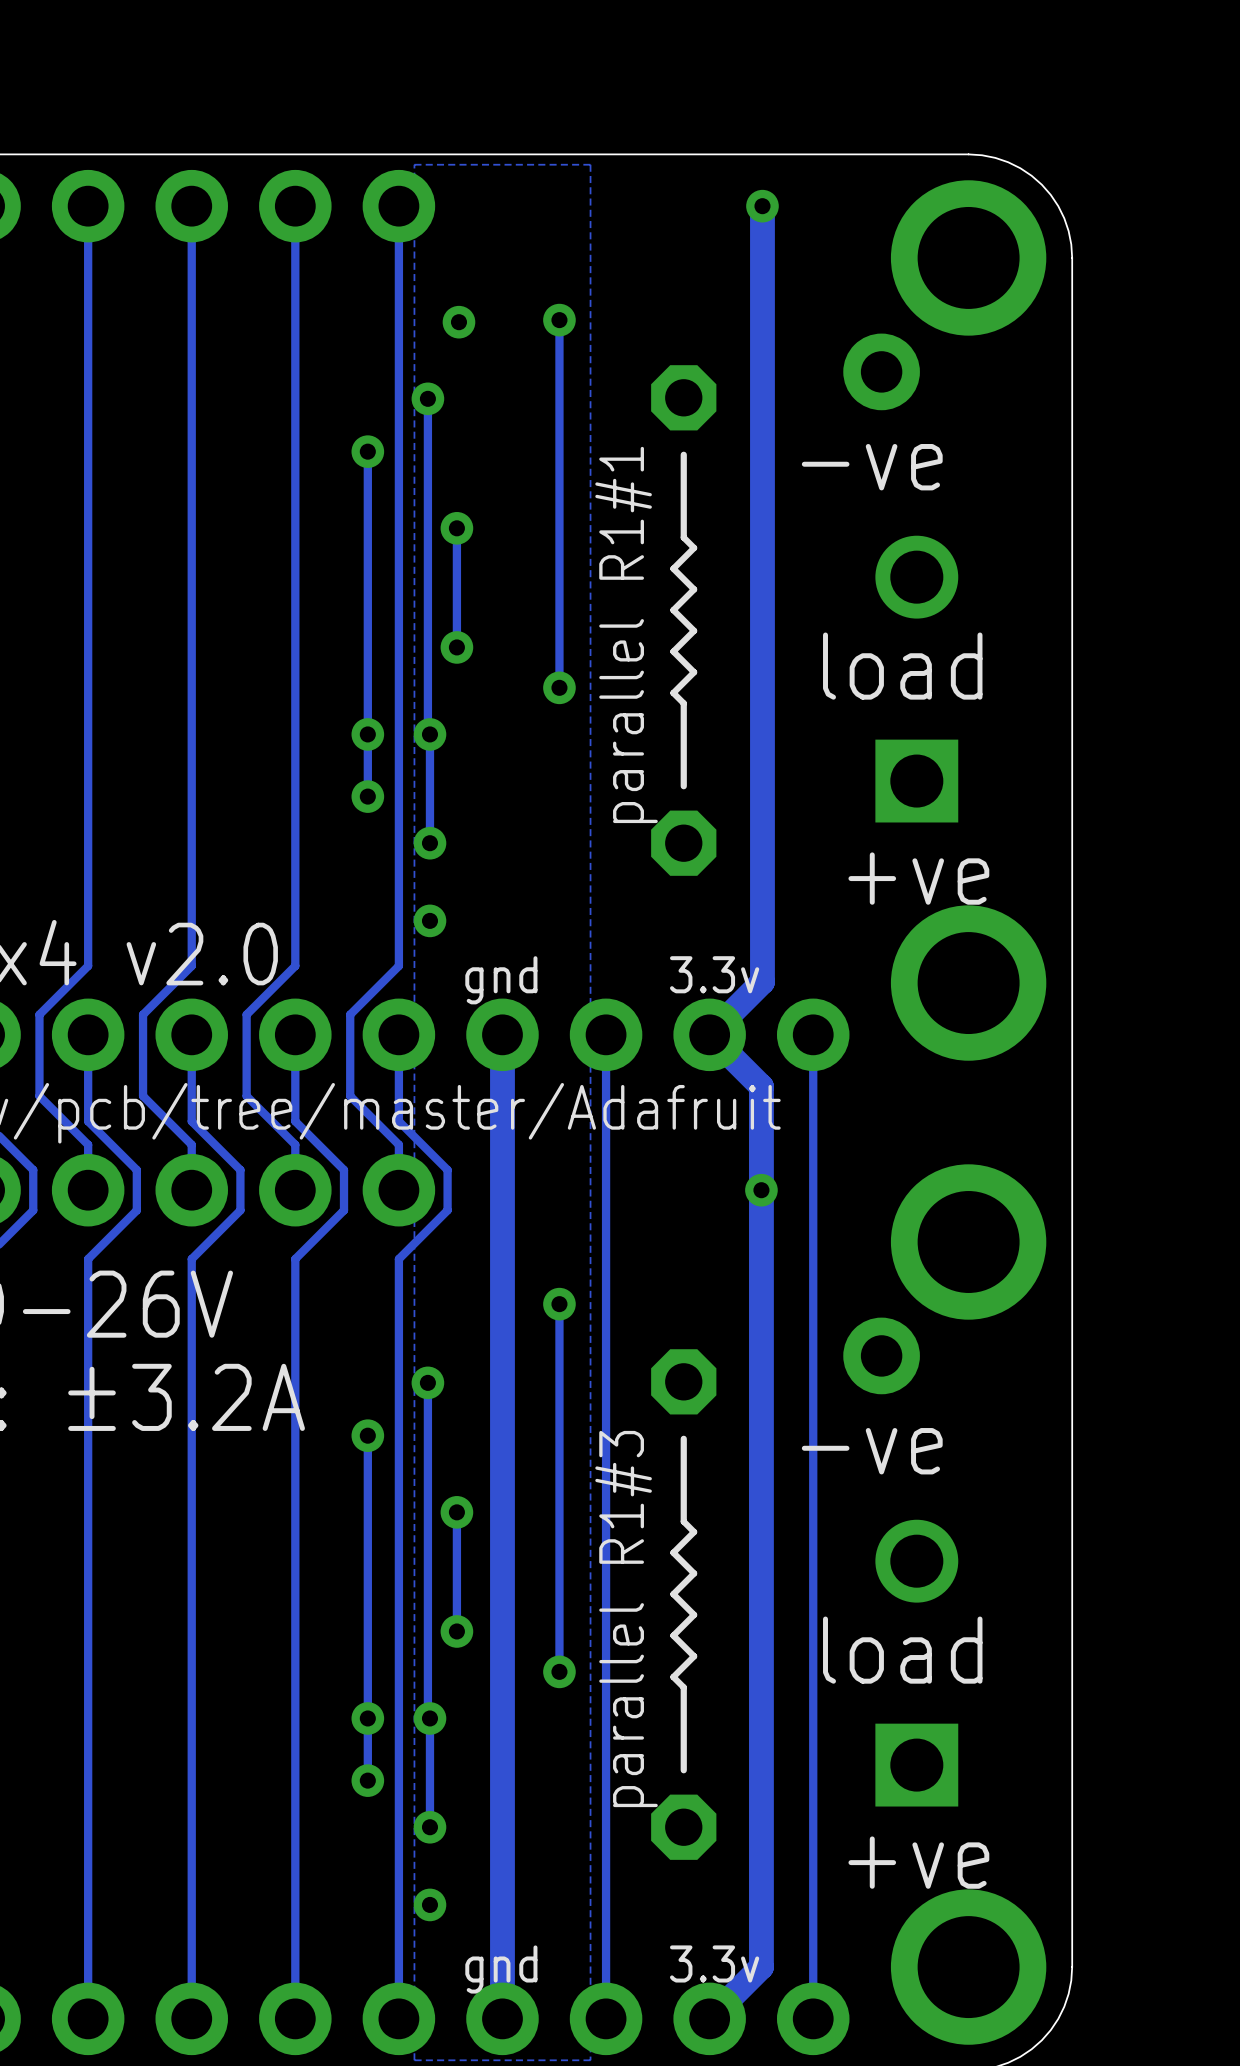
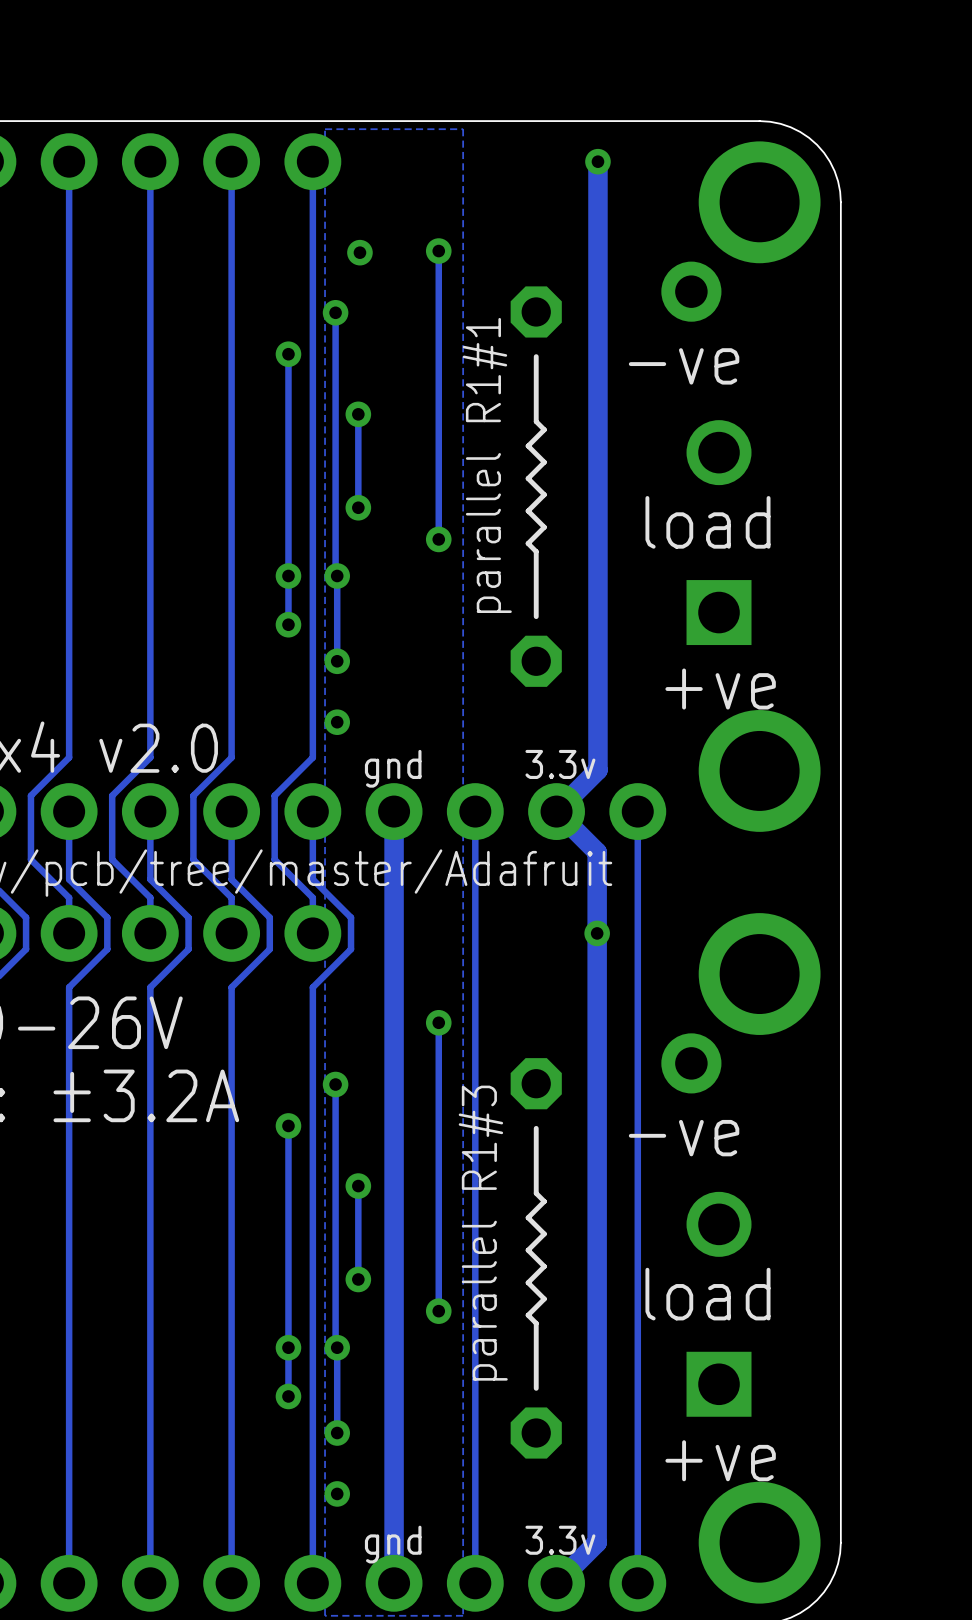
text position: parallel R1#1 (626, 634) -> parallel R1#1 (487, 465)
text position: parallel R1#3 (626, 1619) -> parallel R1#3 (483, 1233)

